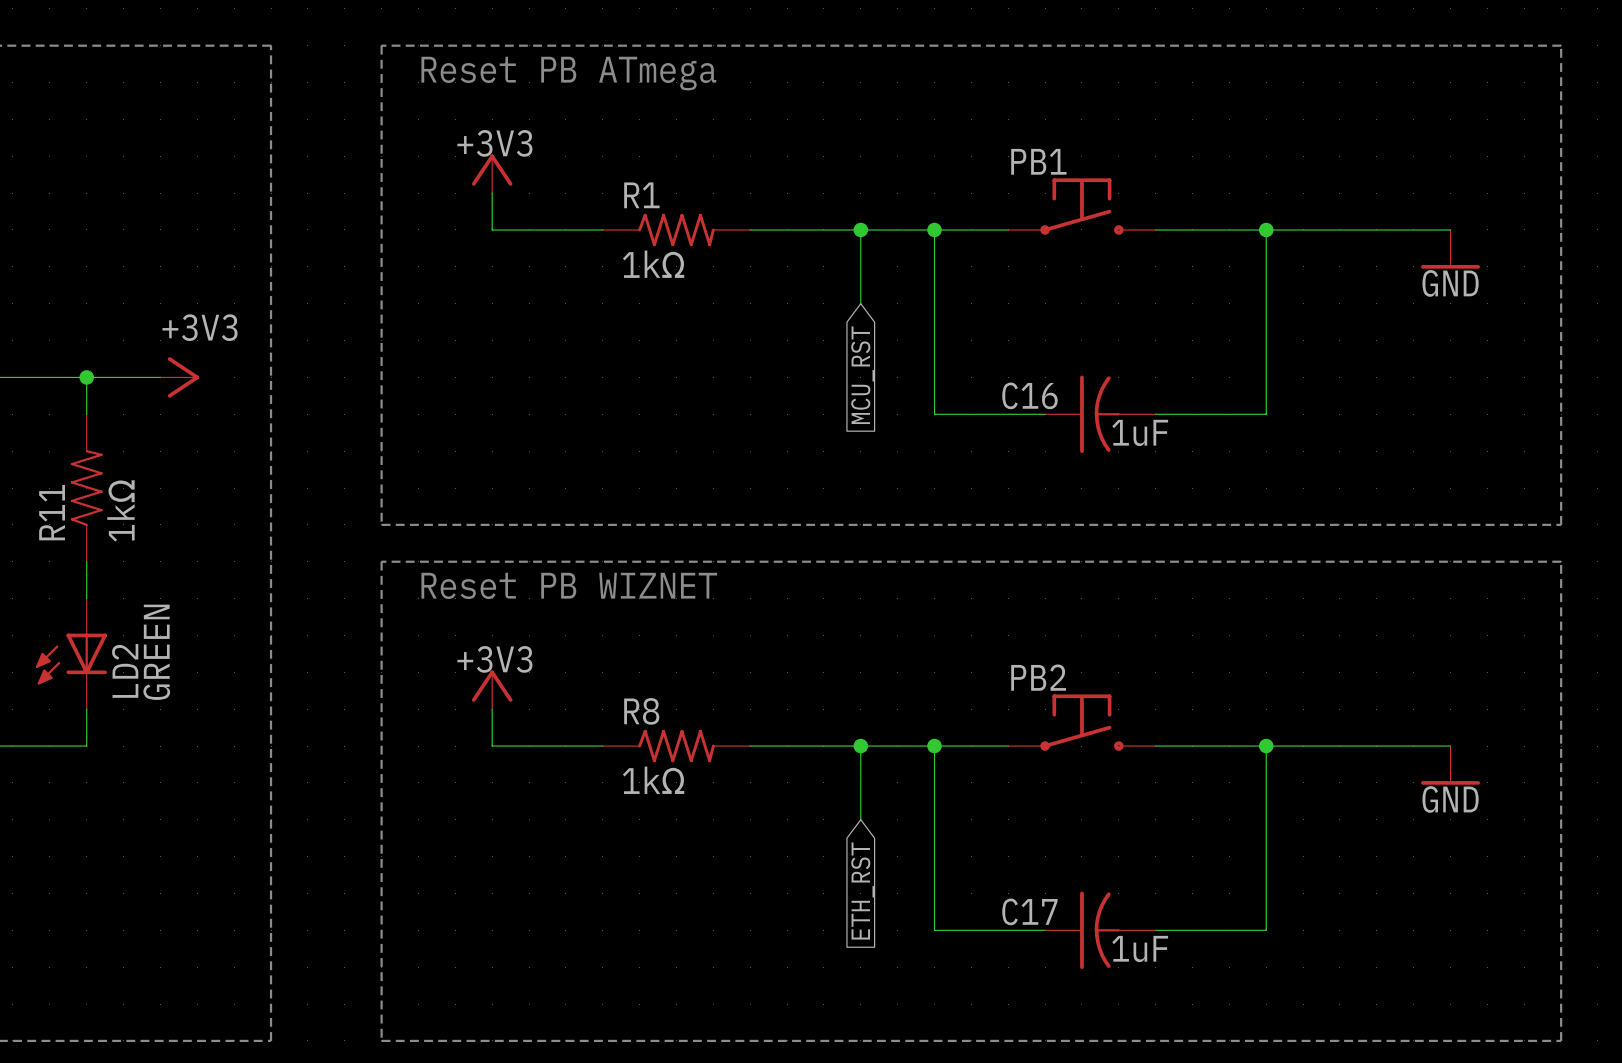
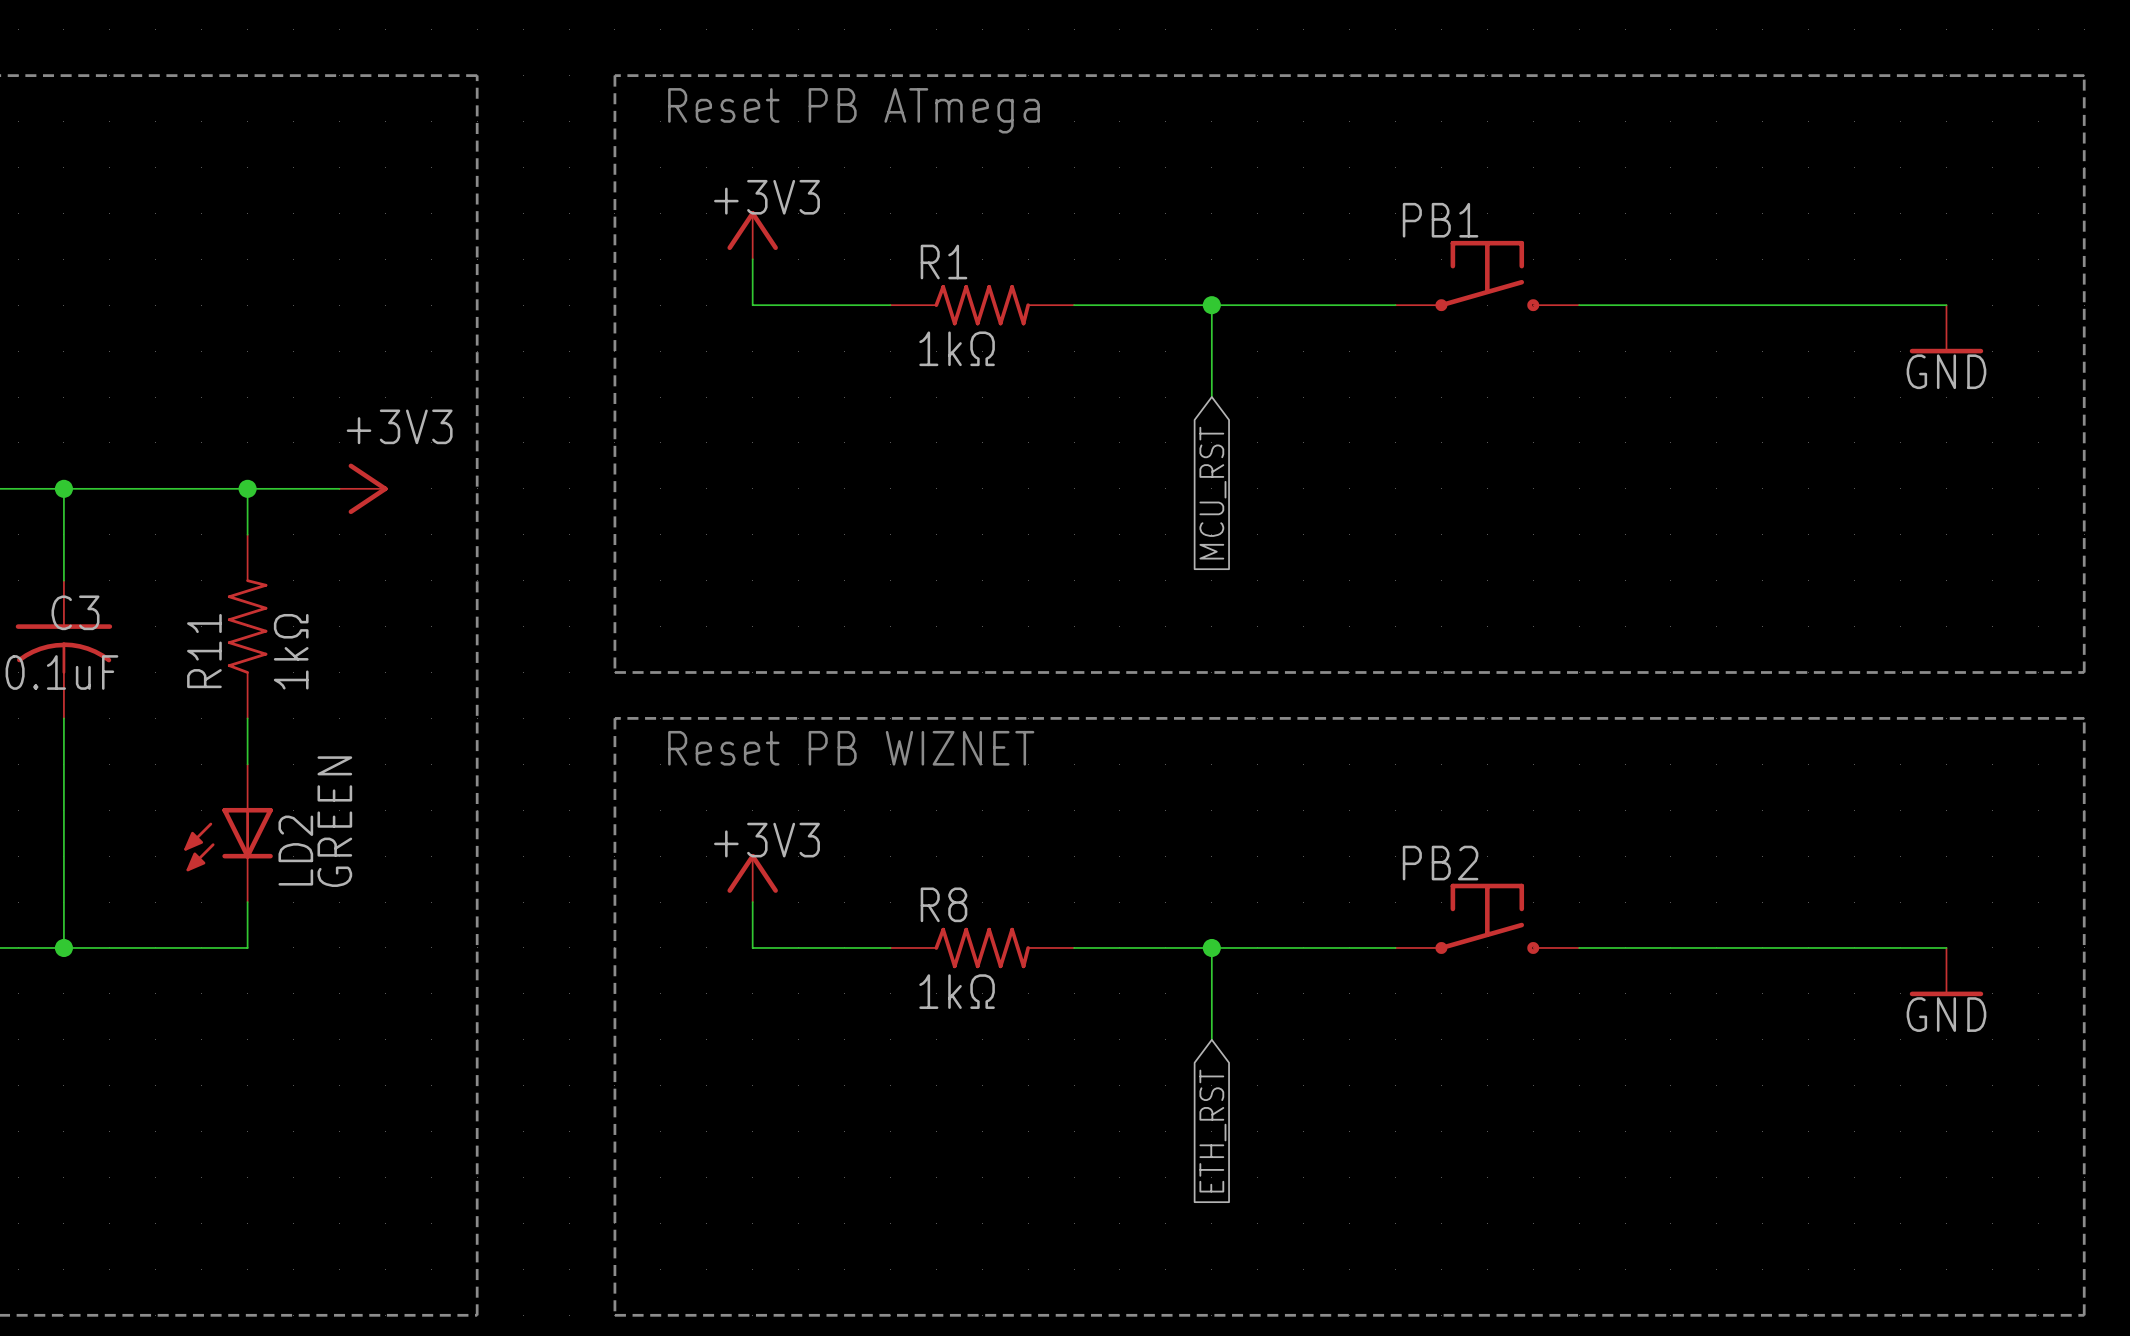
wire: (934, 229) (934, 414) (1045, 414) -> none
junction: (934, 229) -> none
wire: (1266, 229) (1266, 414) (1155, 414) -> none
junction: (1266, 229) -> none
C16: 1uF (1100, 414) -> none
wire: (934, 746) (934, 930) (1045, 930) -> none
junction: (934, 746) -> none
wire: (1266, 746) (1266, 930) (1155, 930) -> none
junction: (1266, 746) -> none
C17: 1uF (1100, 930) -> none

